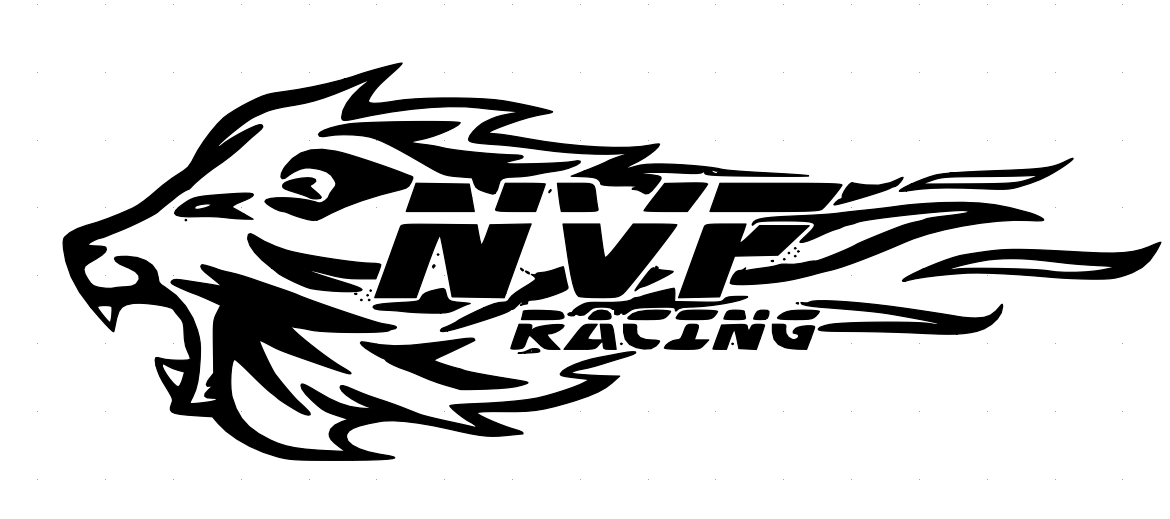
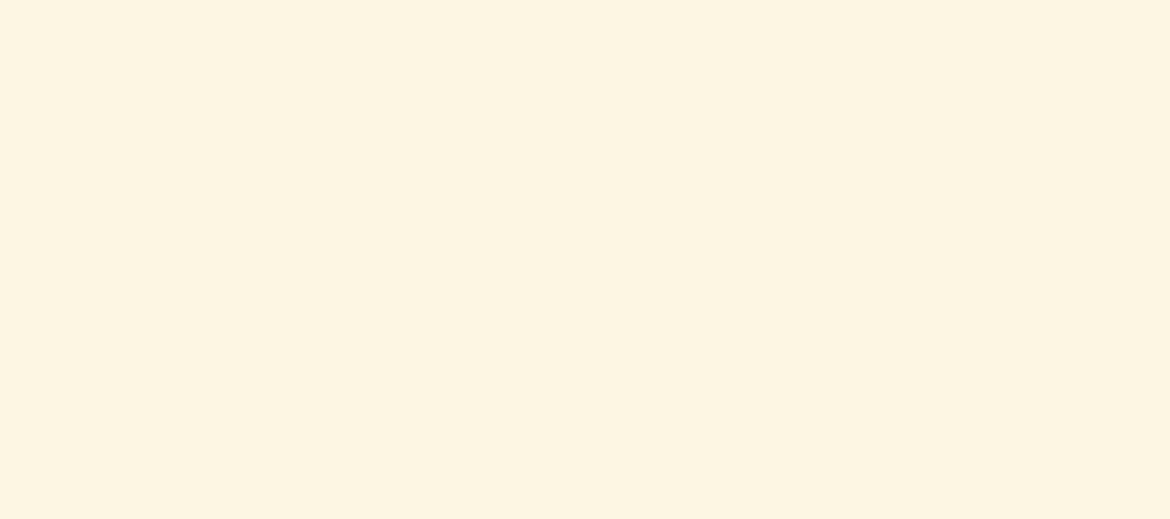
power symbol: (611, 261) -> none

